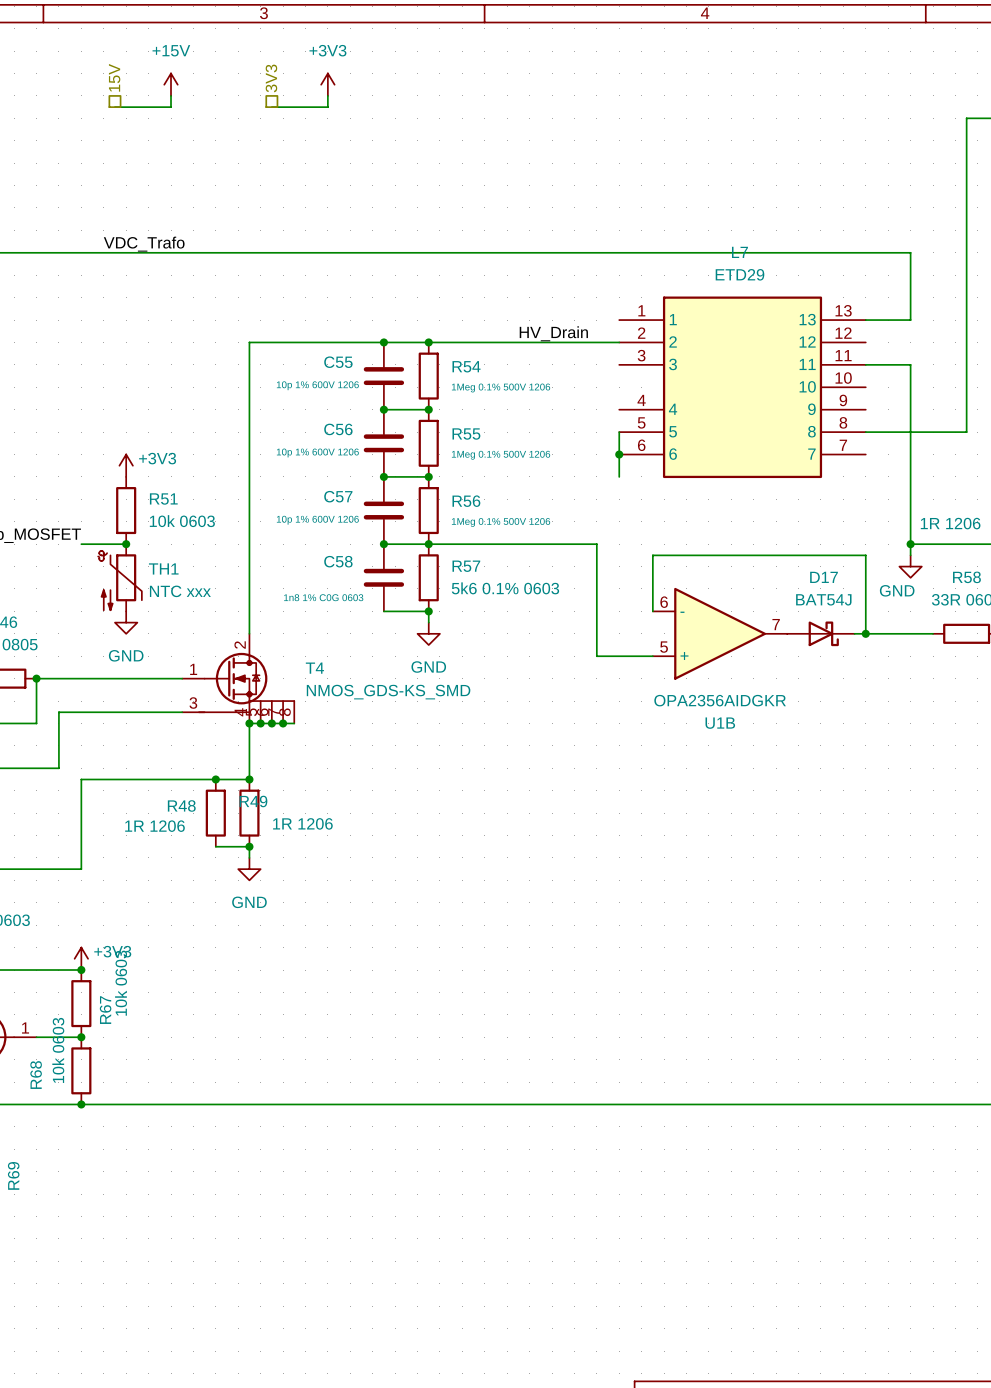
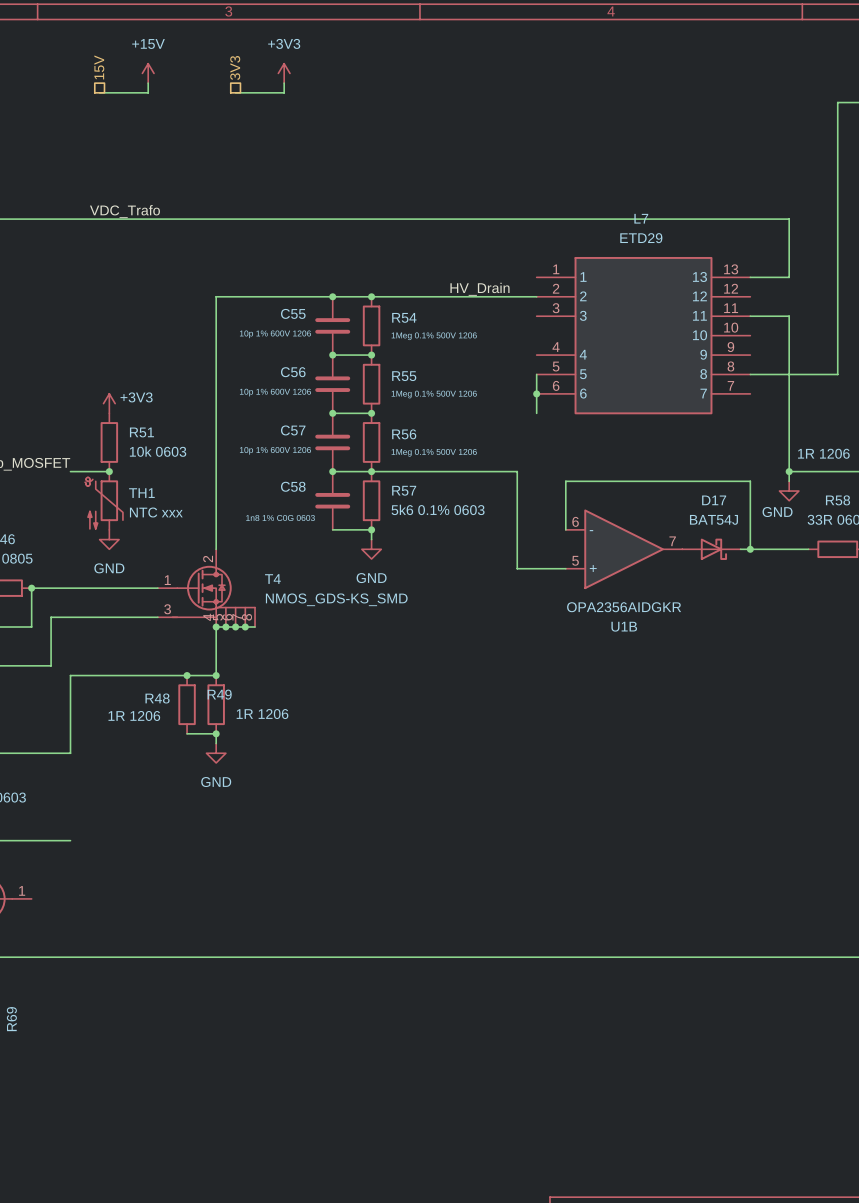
power symbol: +3V3 (81, 958) -> none
junction: (81, 970) -> none
R67: 10k 0603 (81, 1003) -> none
wire: (36, 1037) (81, 1037) -> none
junction: (81, 1037) -> none
R68: 10k 0603 (81, 1070) -> none
junction: (81, 1104) -> none

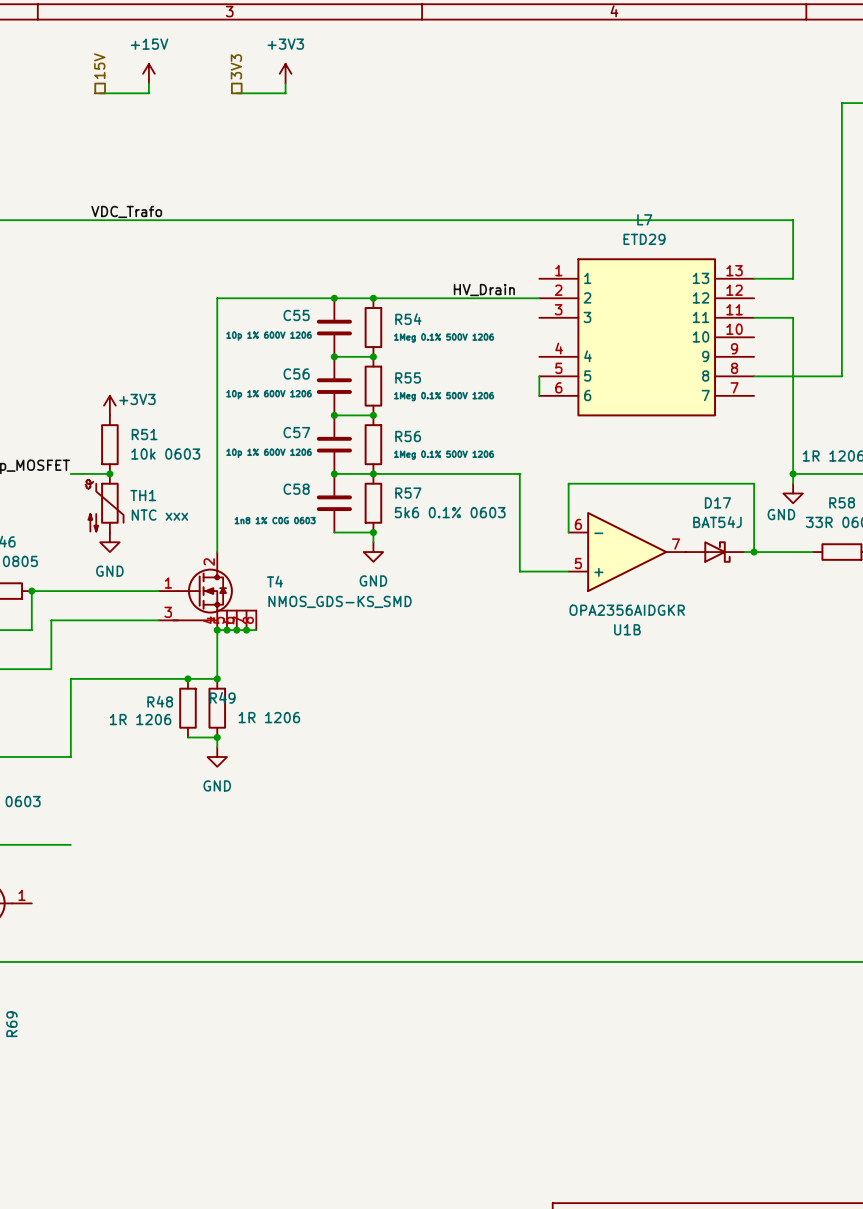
wire: (536, 393) (536, 413) -> none
junction: (536, 393) -> none

